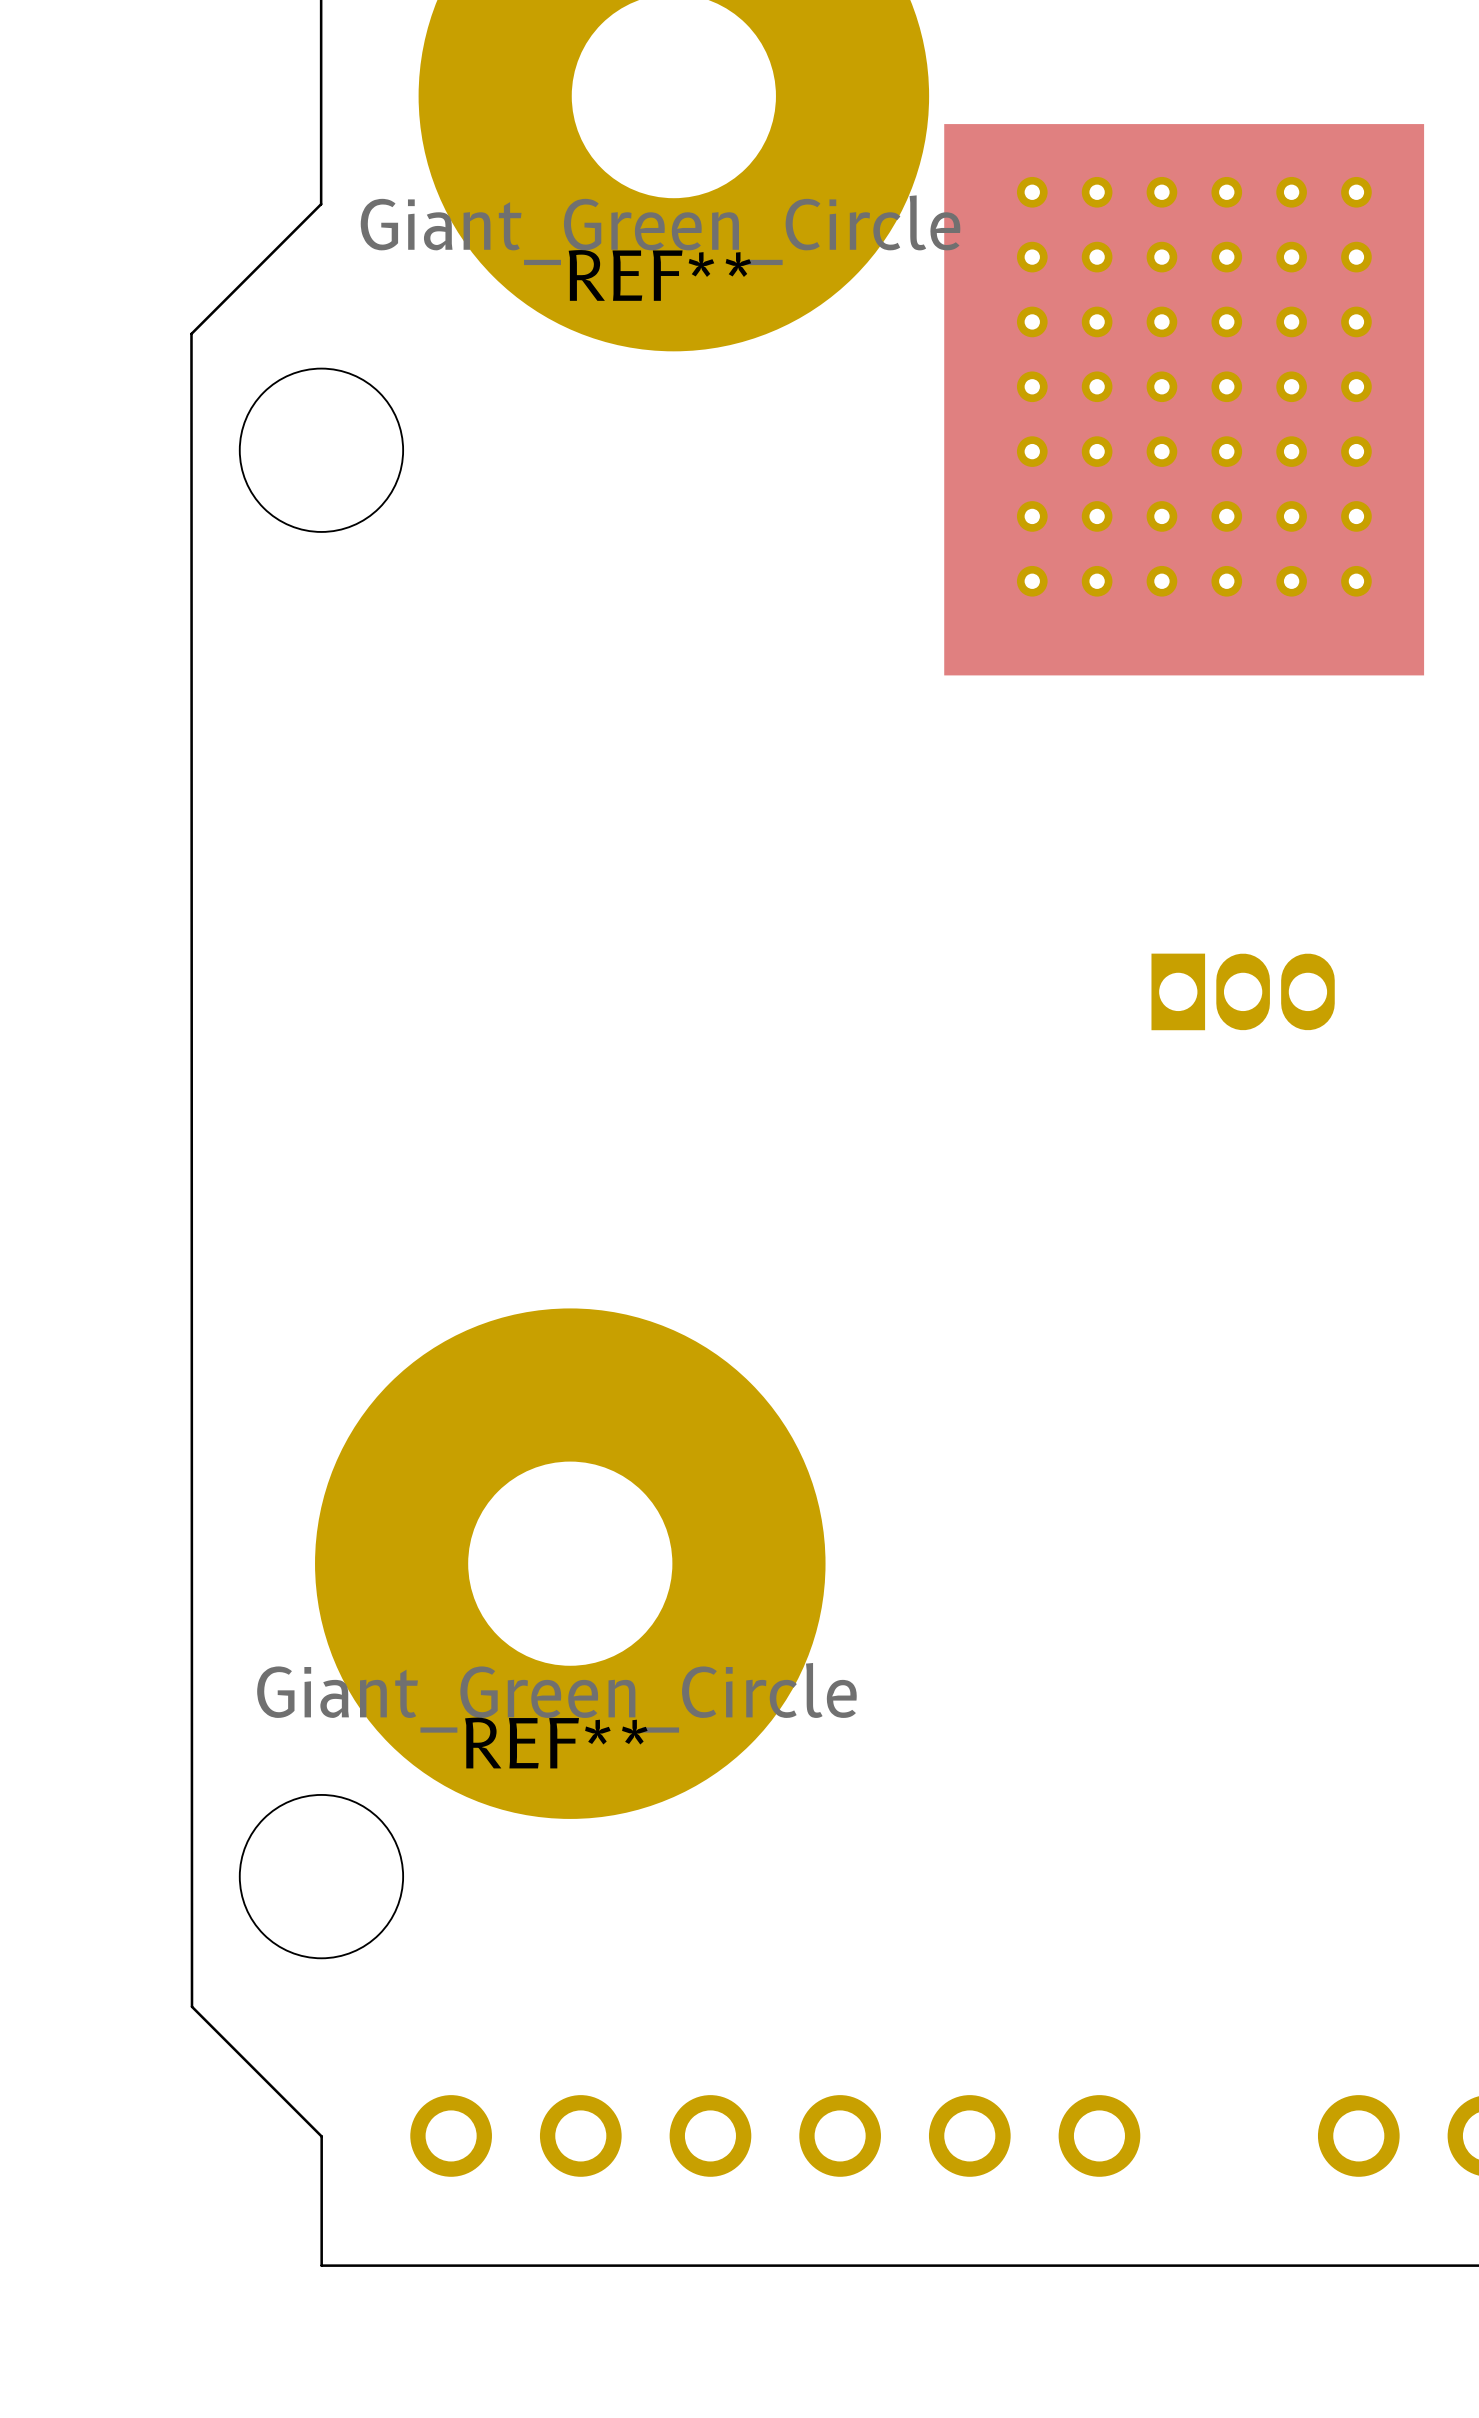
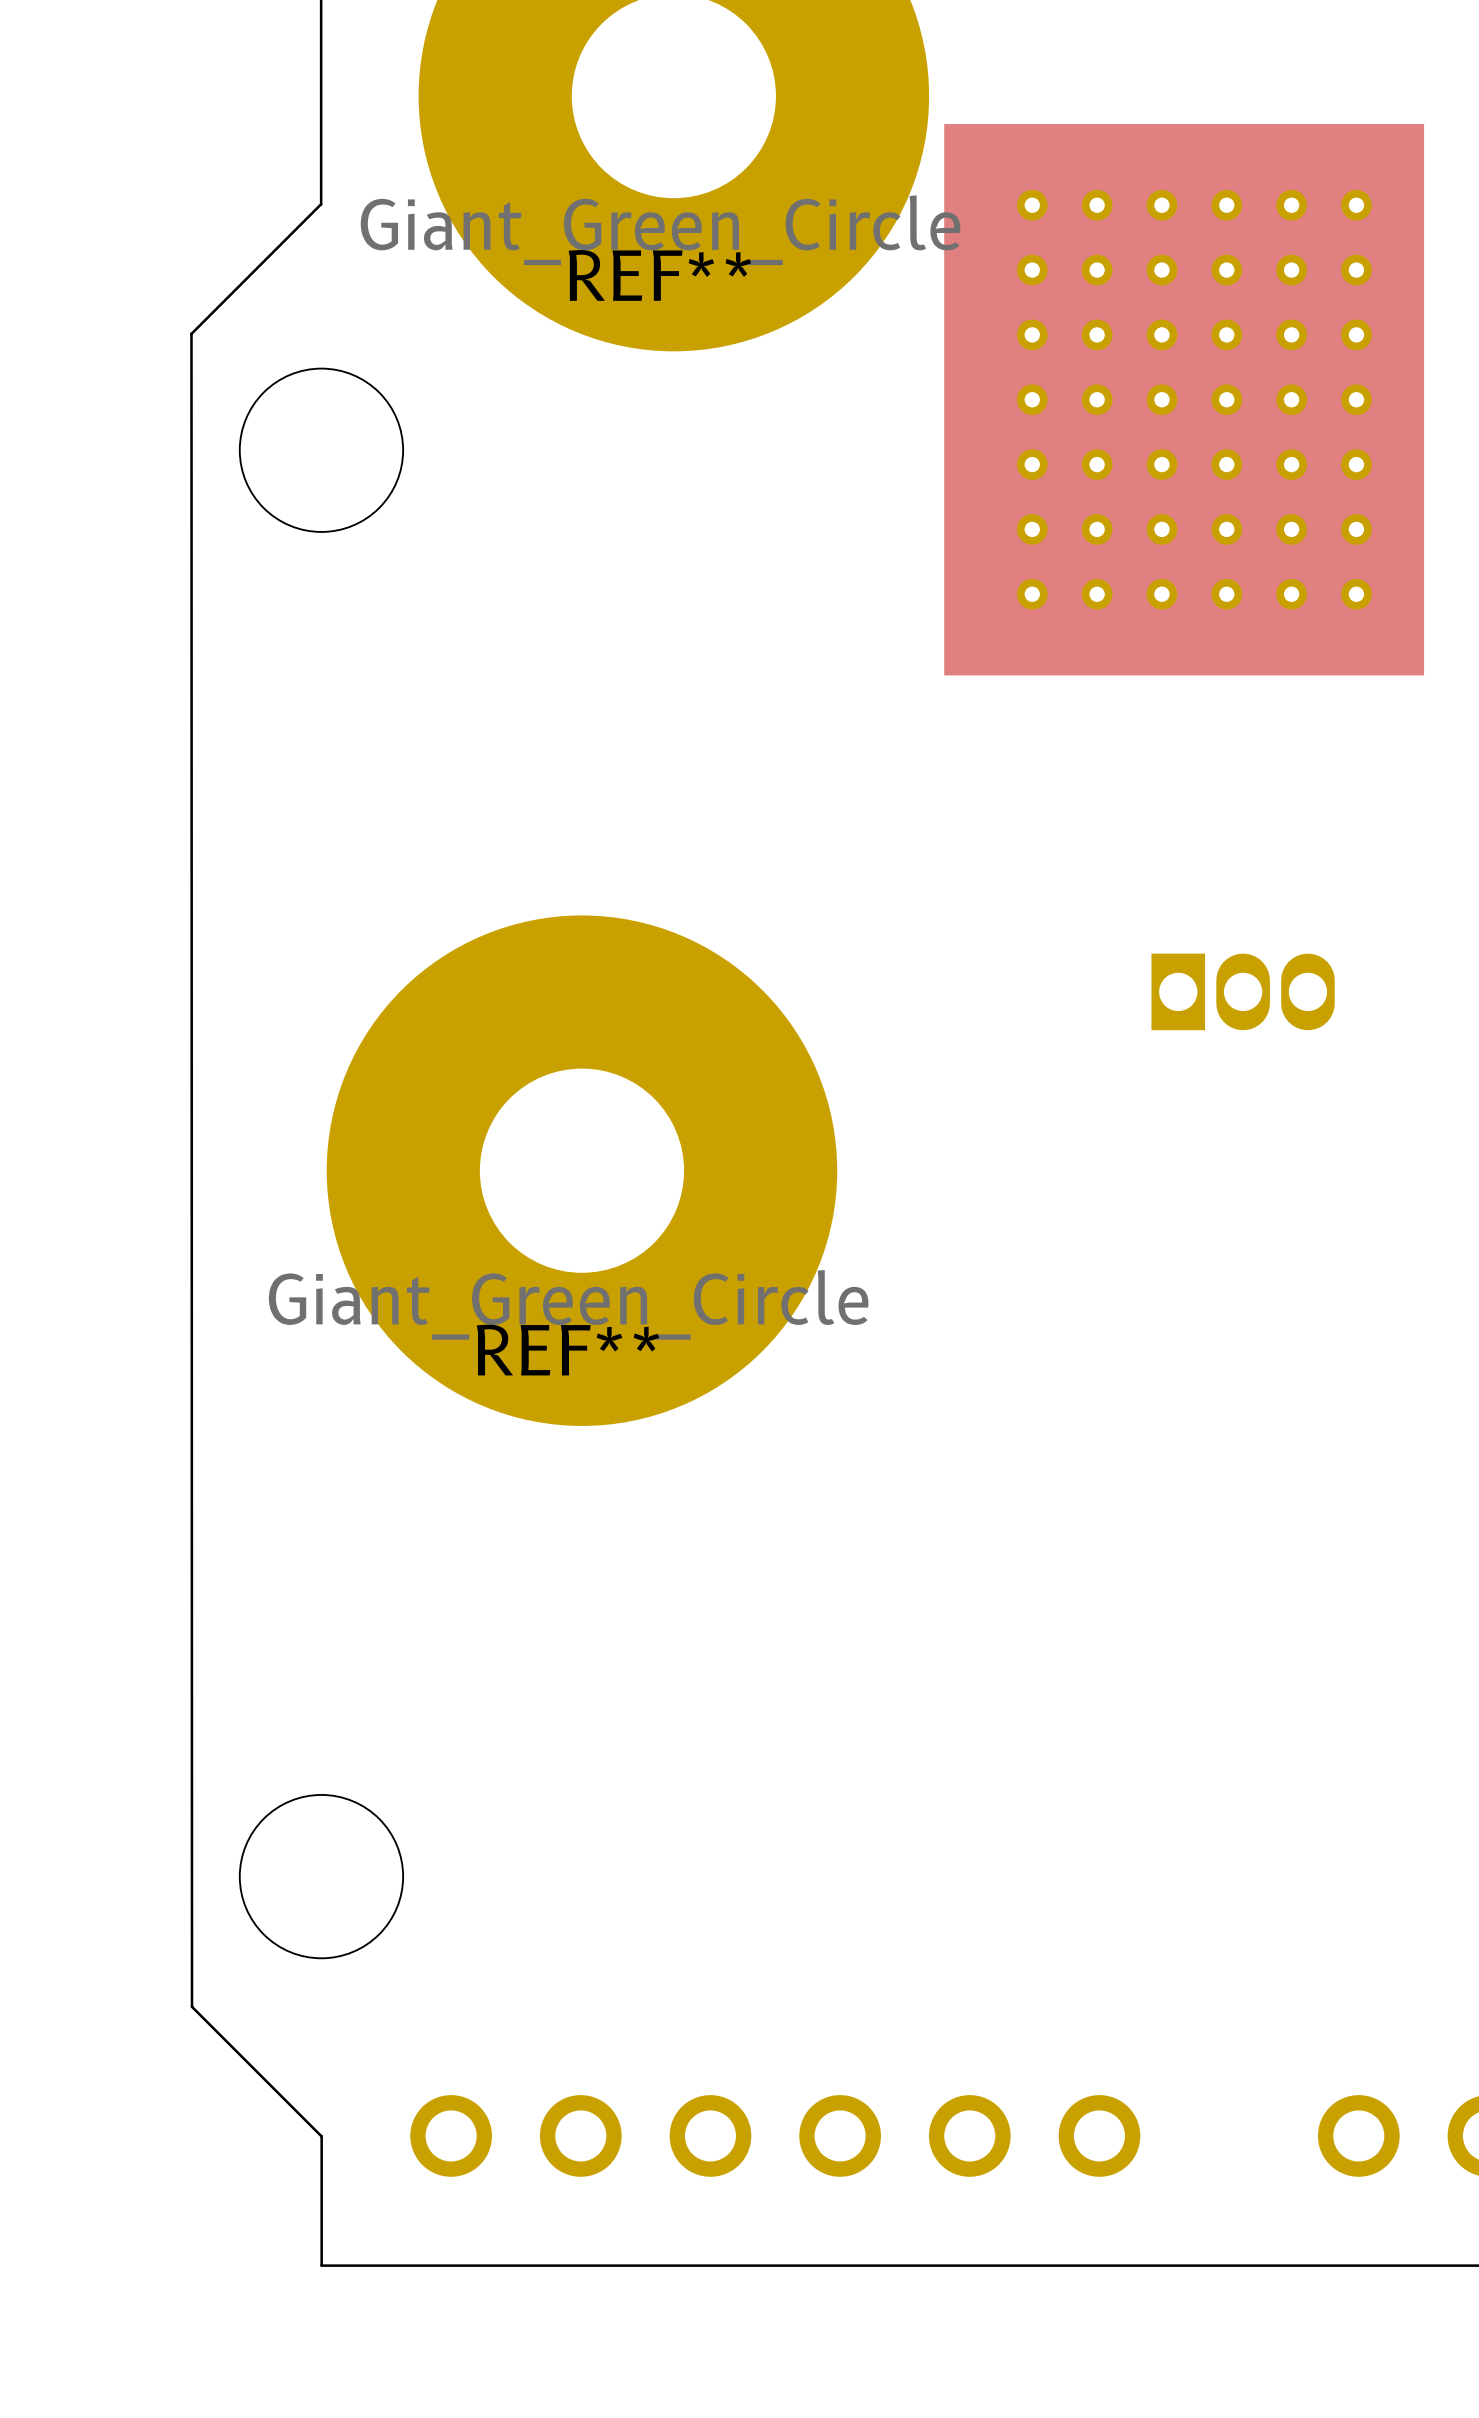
part footprint: [944, 124, 1425, 676] -> [944, 124, 1425, 676]
REF** position: (570, 1563) -> (581, 1170)

